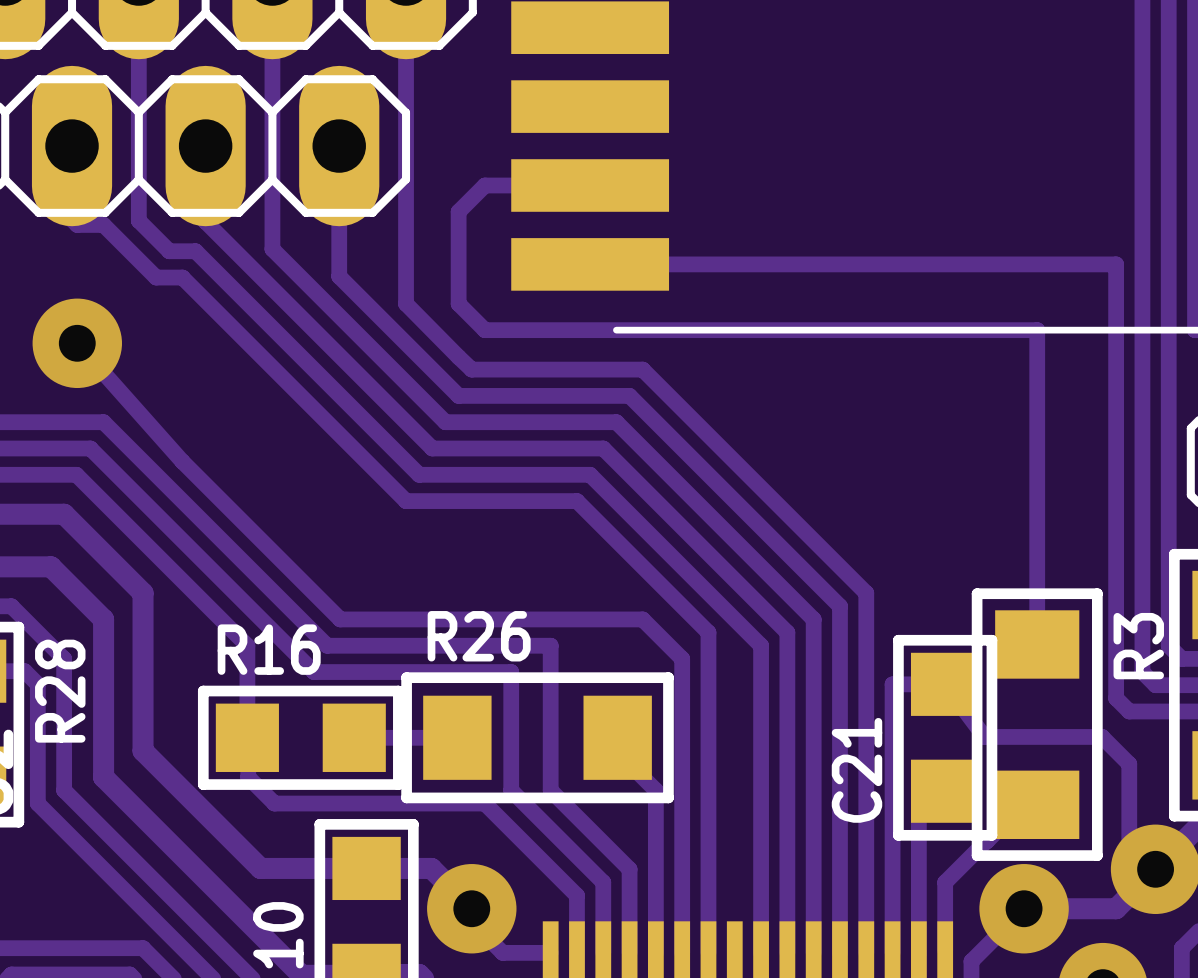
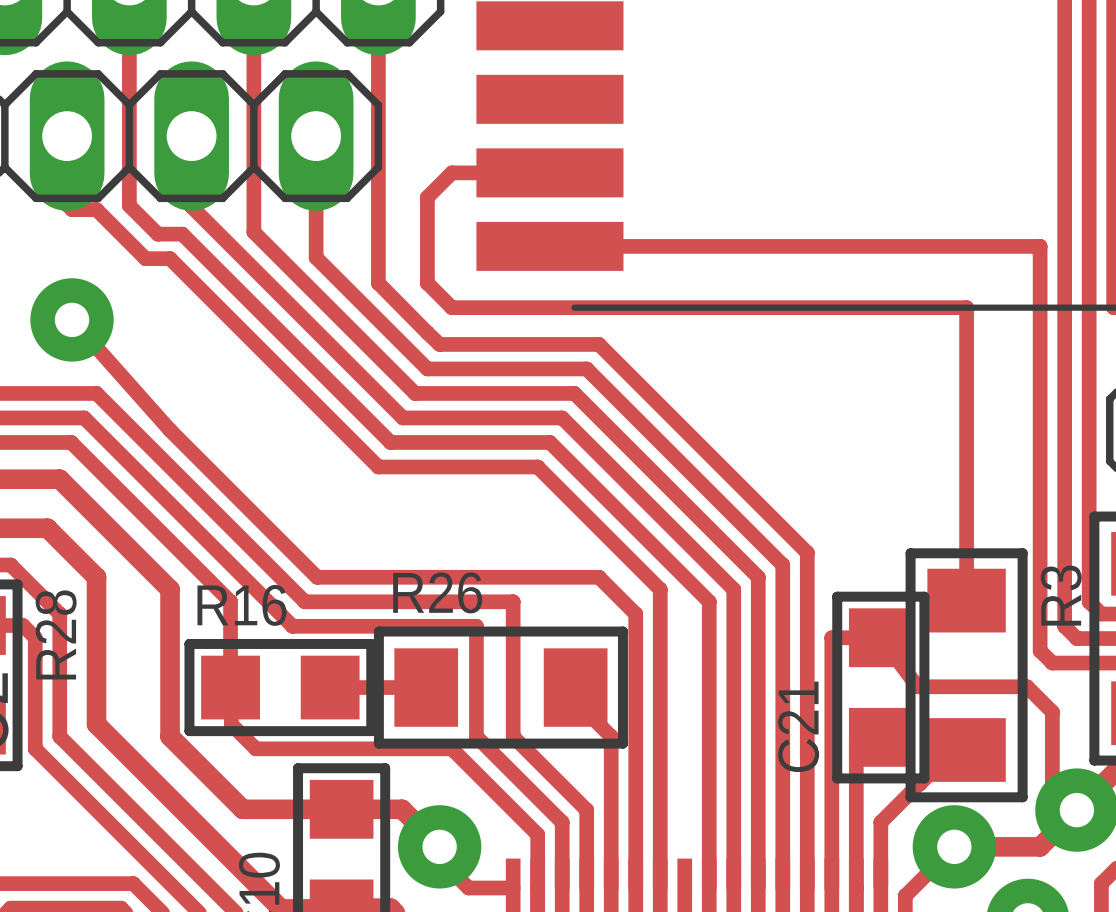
track: (143, 593) (143, 750) (182, 790) -> (133, 552) (170, 589) (170, 736)

